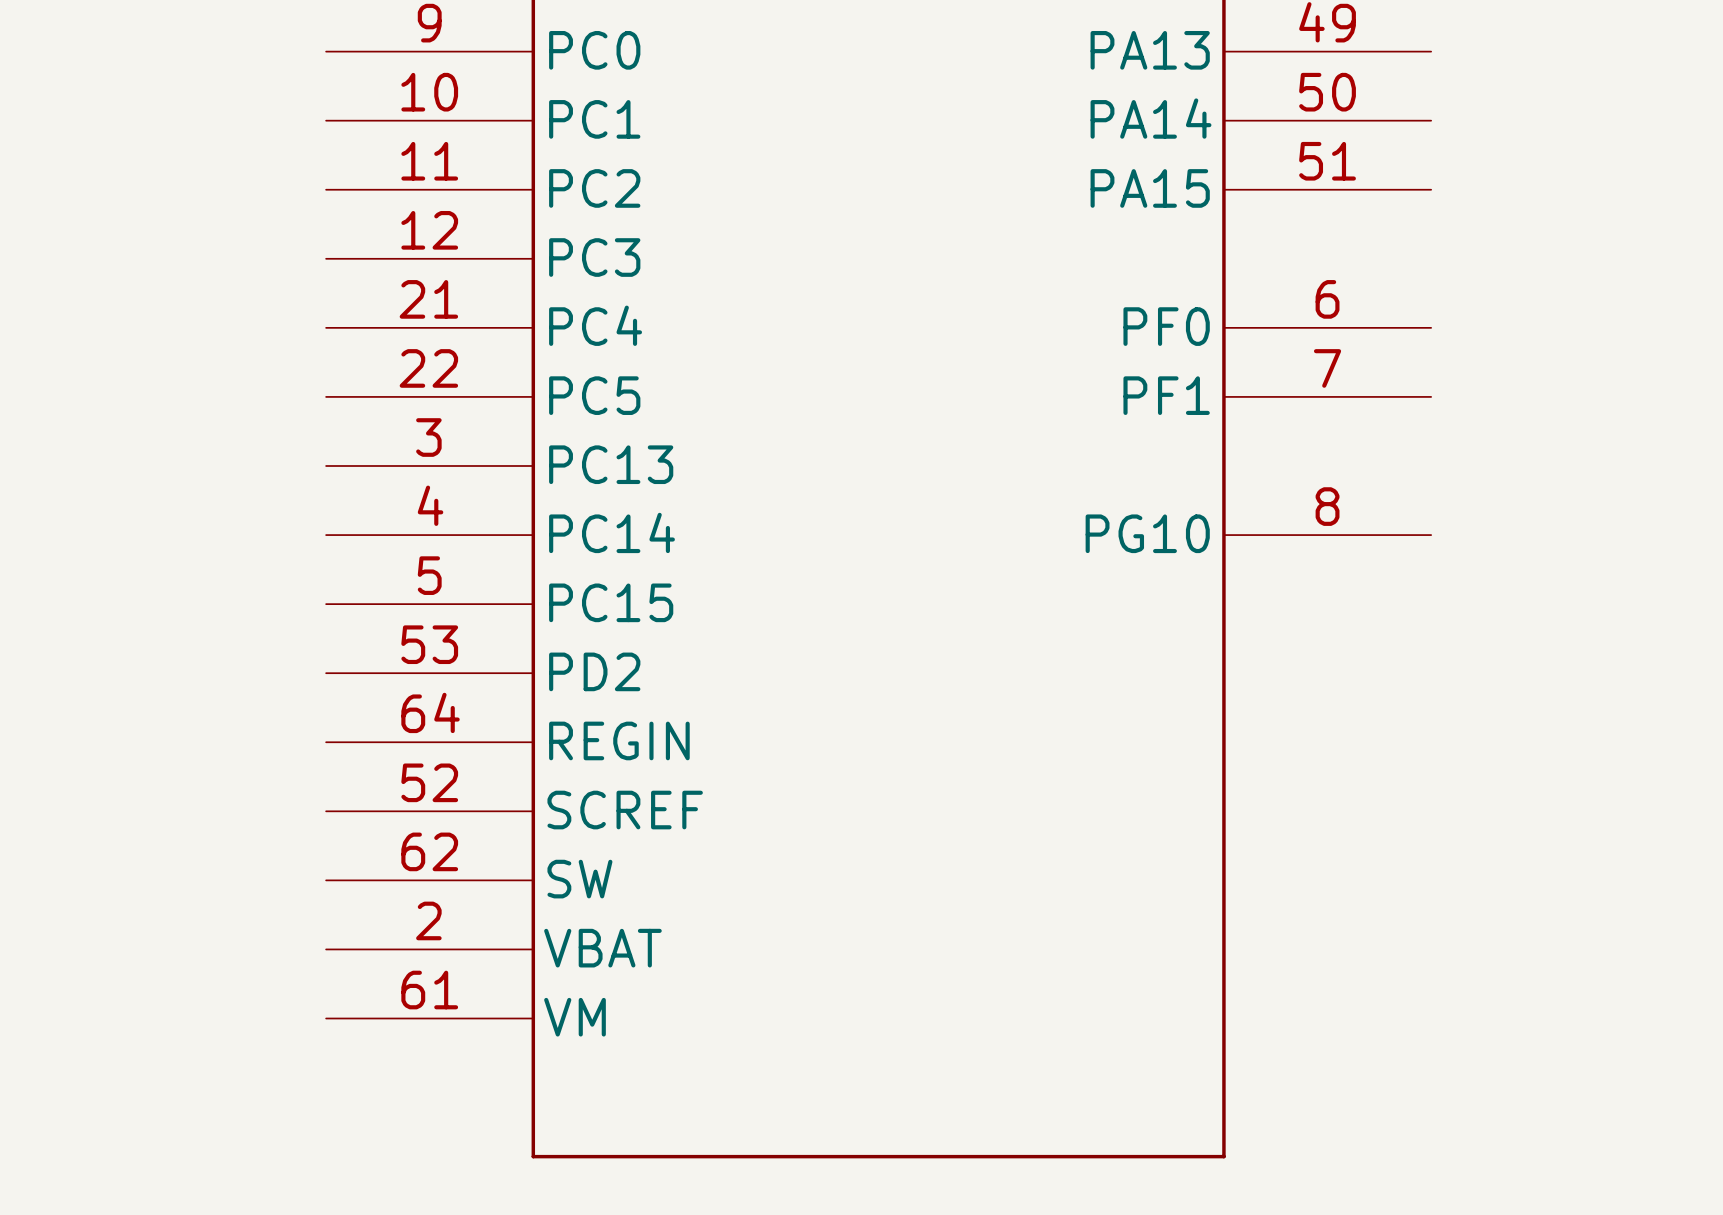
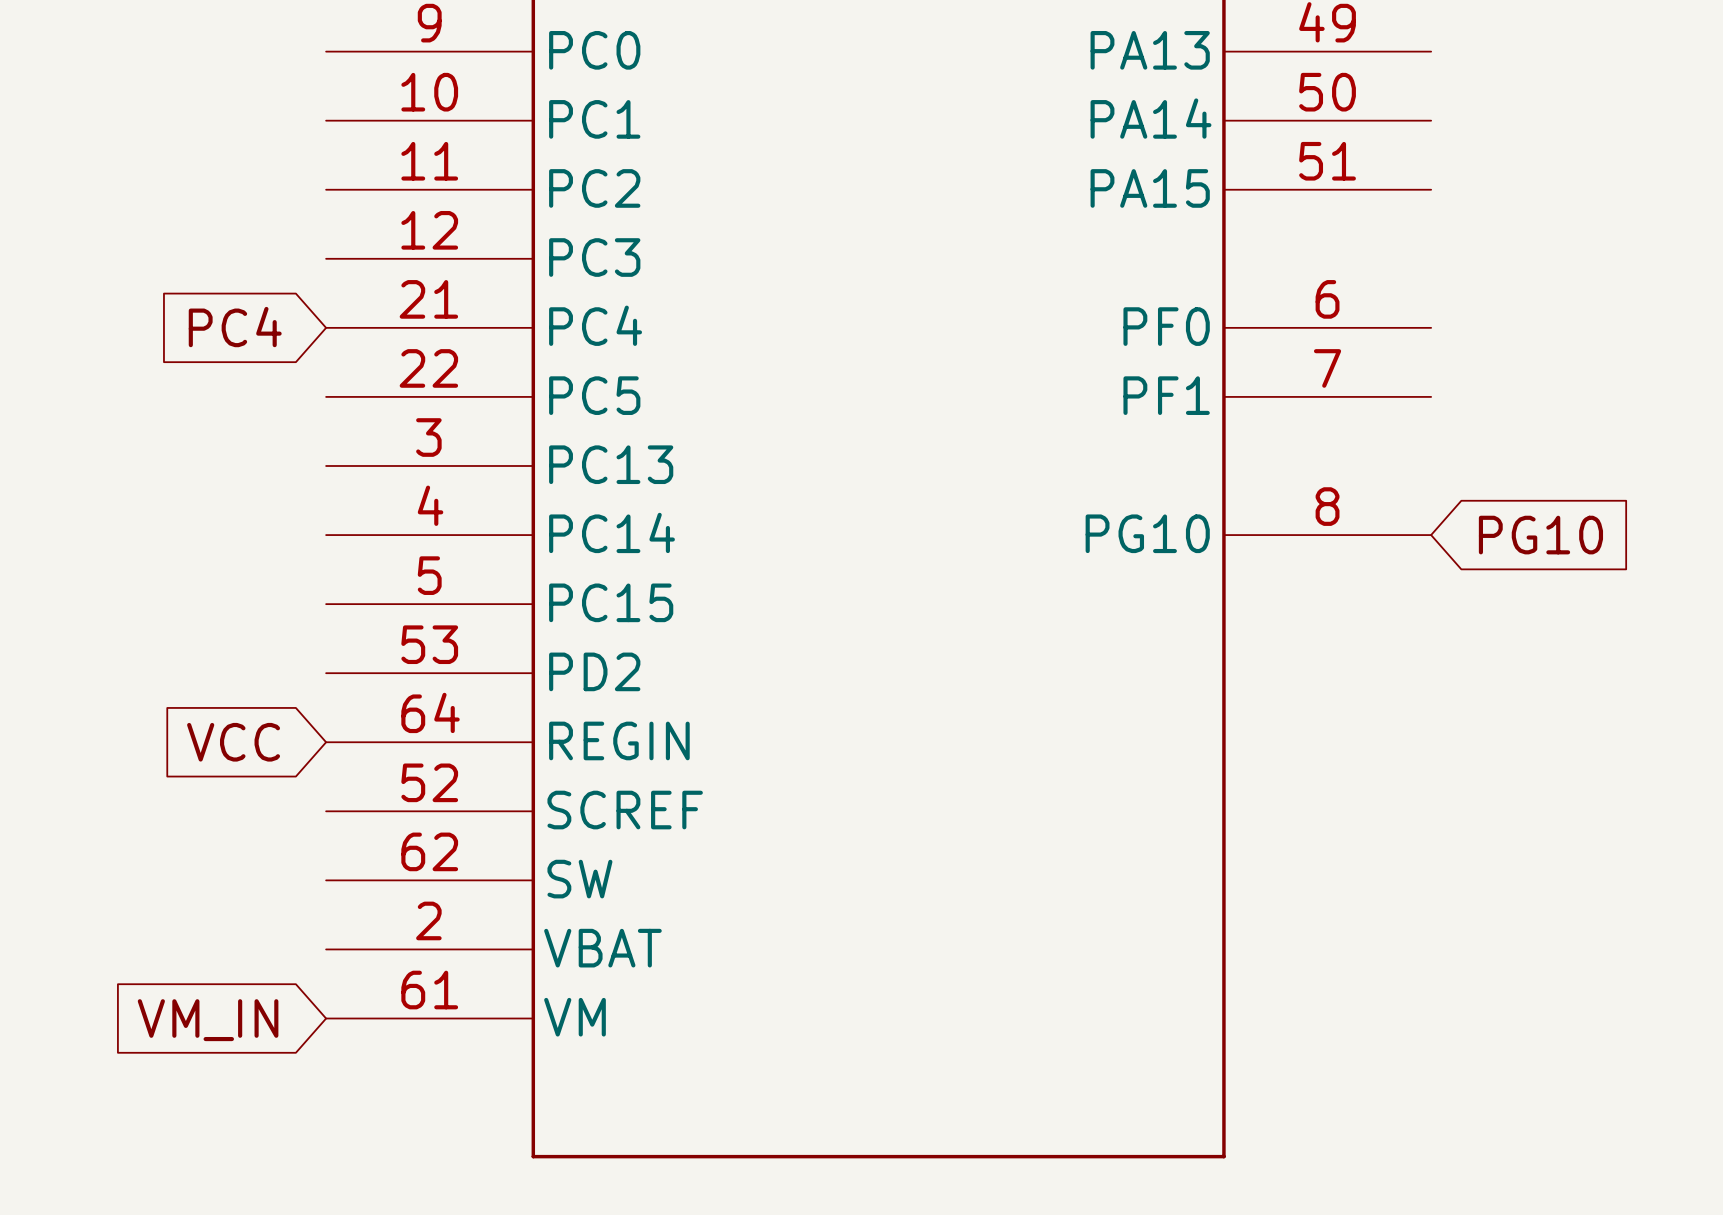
global label: none -> PC4 (235, 327)
global label: none -> PG10 (1540, 535)
global label: none -> VCC (233, 742)
global label: none -> VM_IN (208, 1020)

